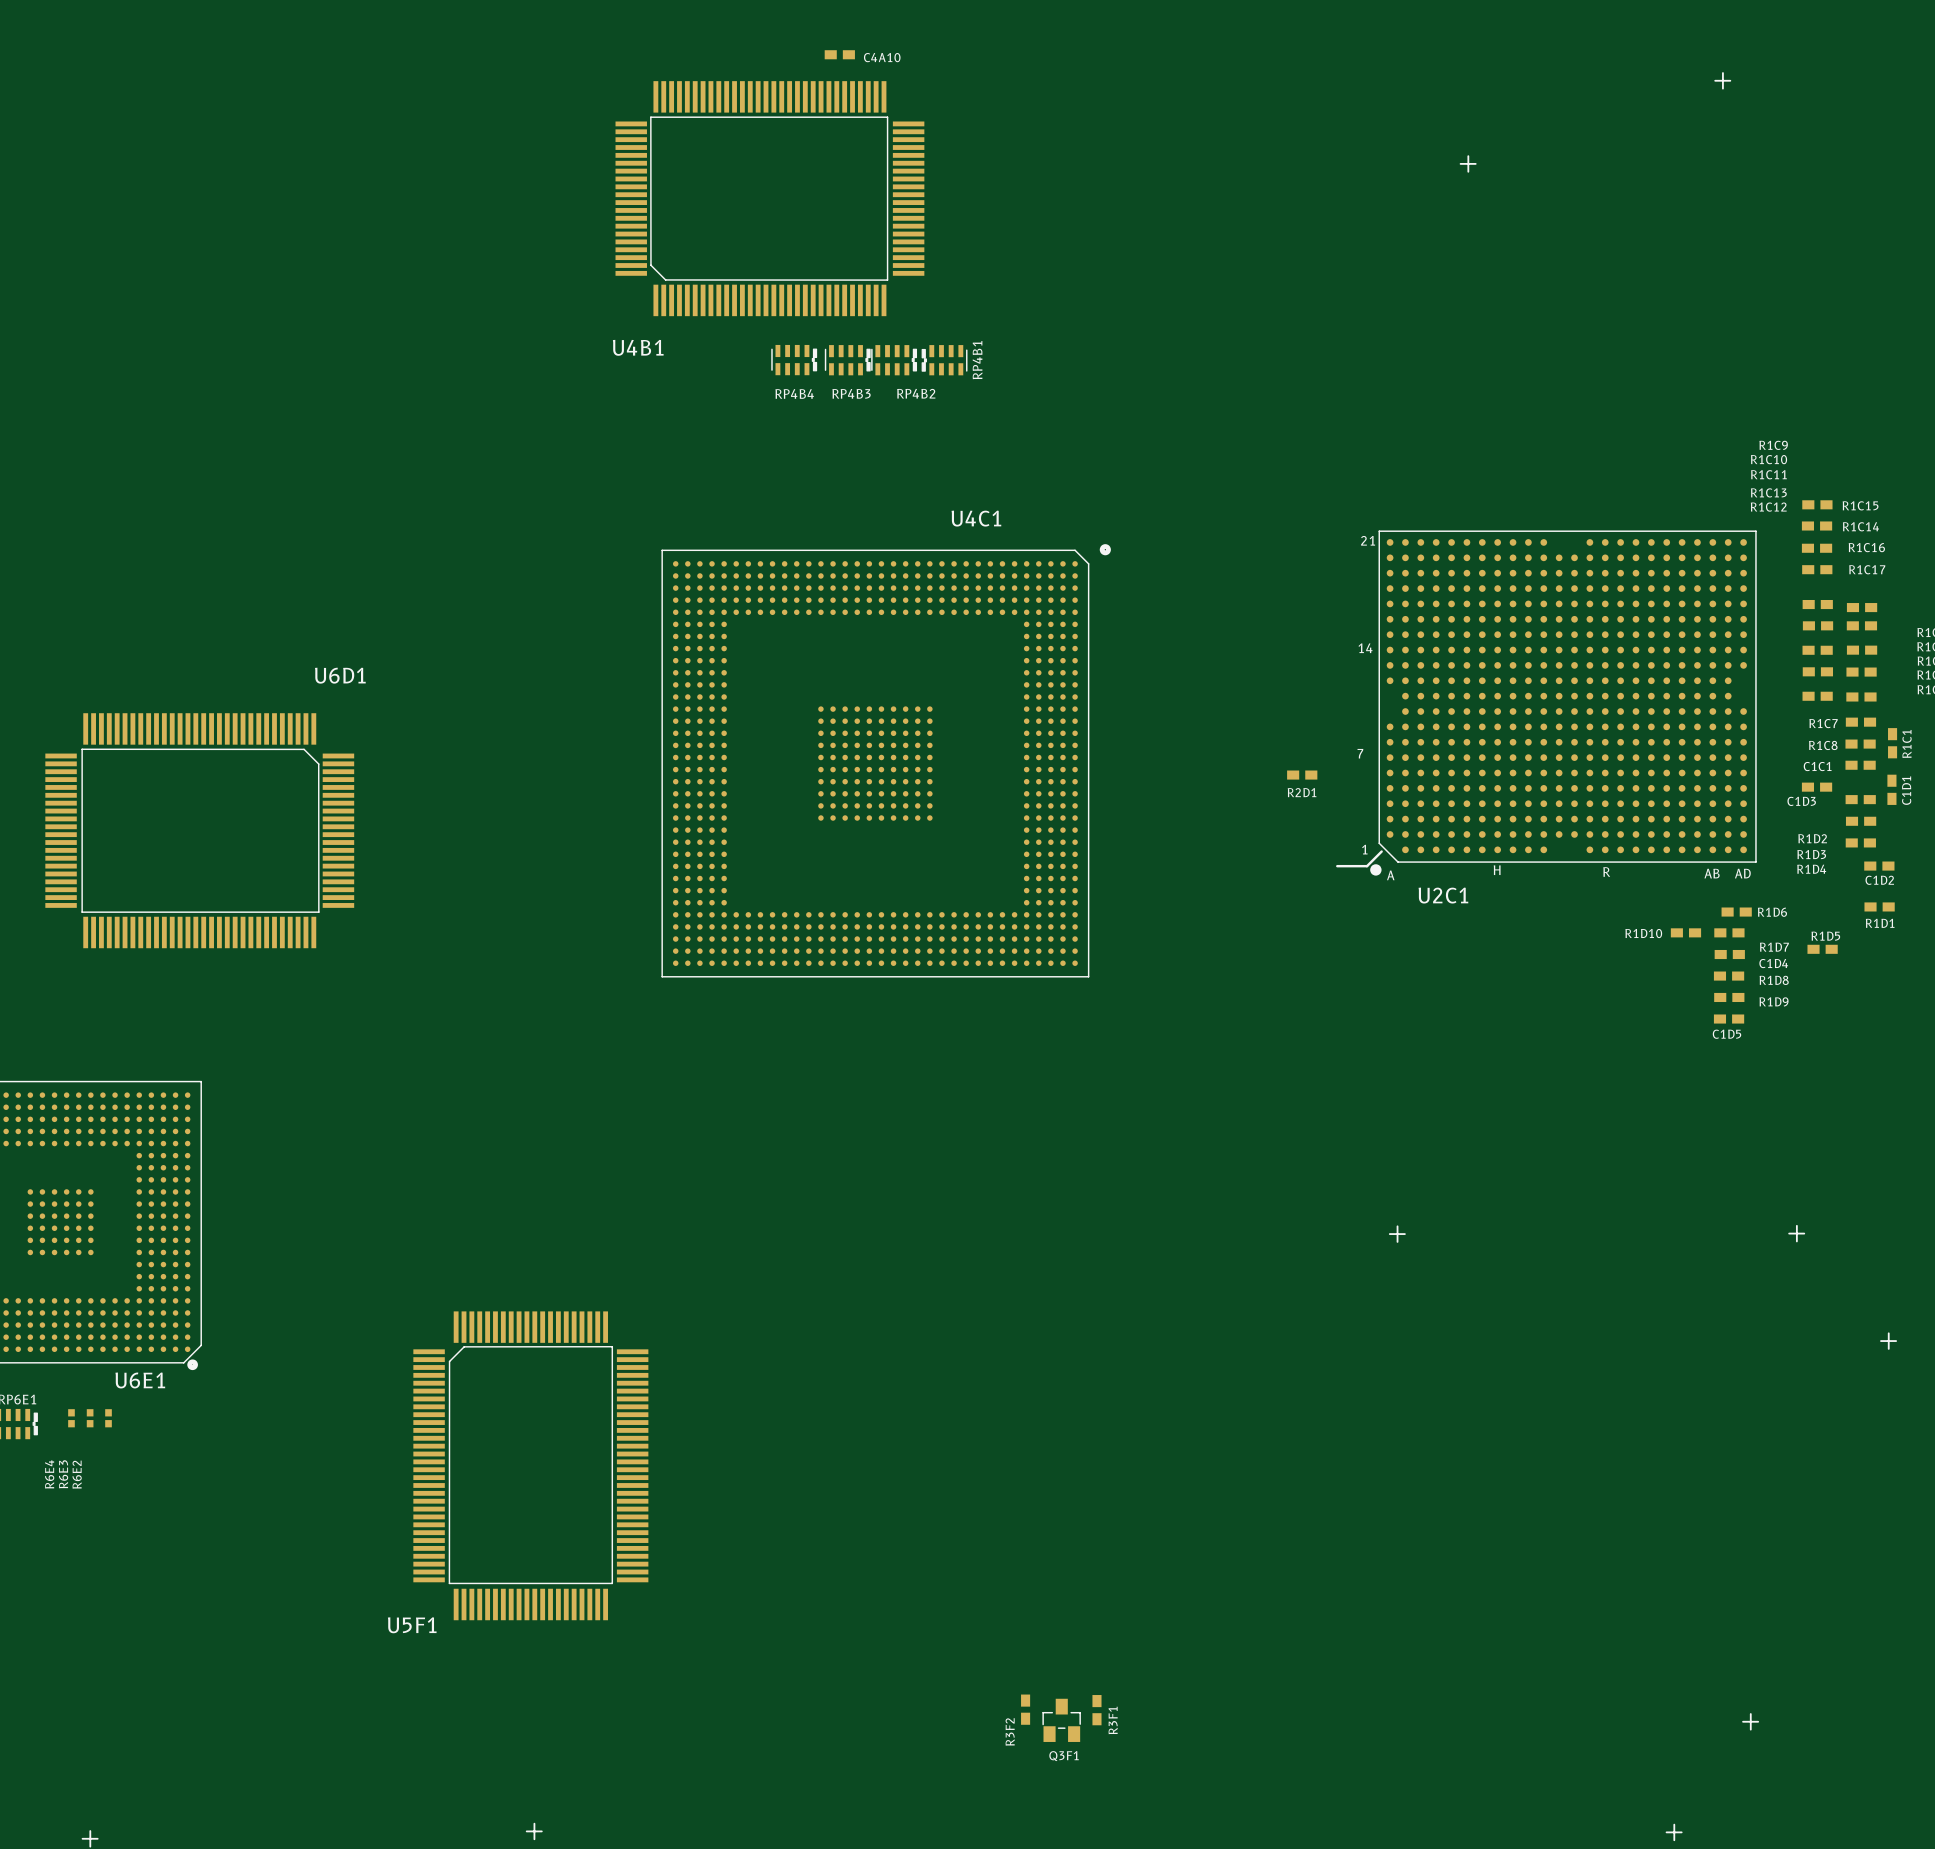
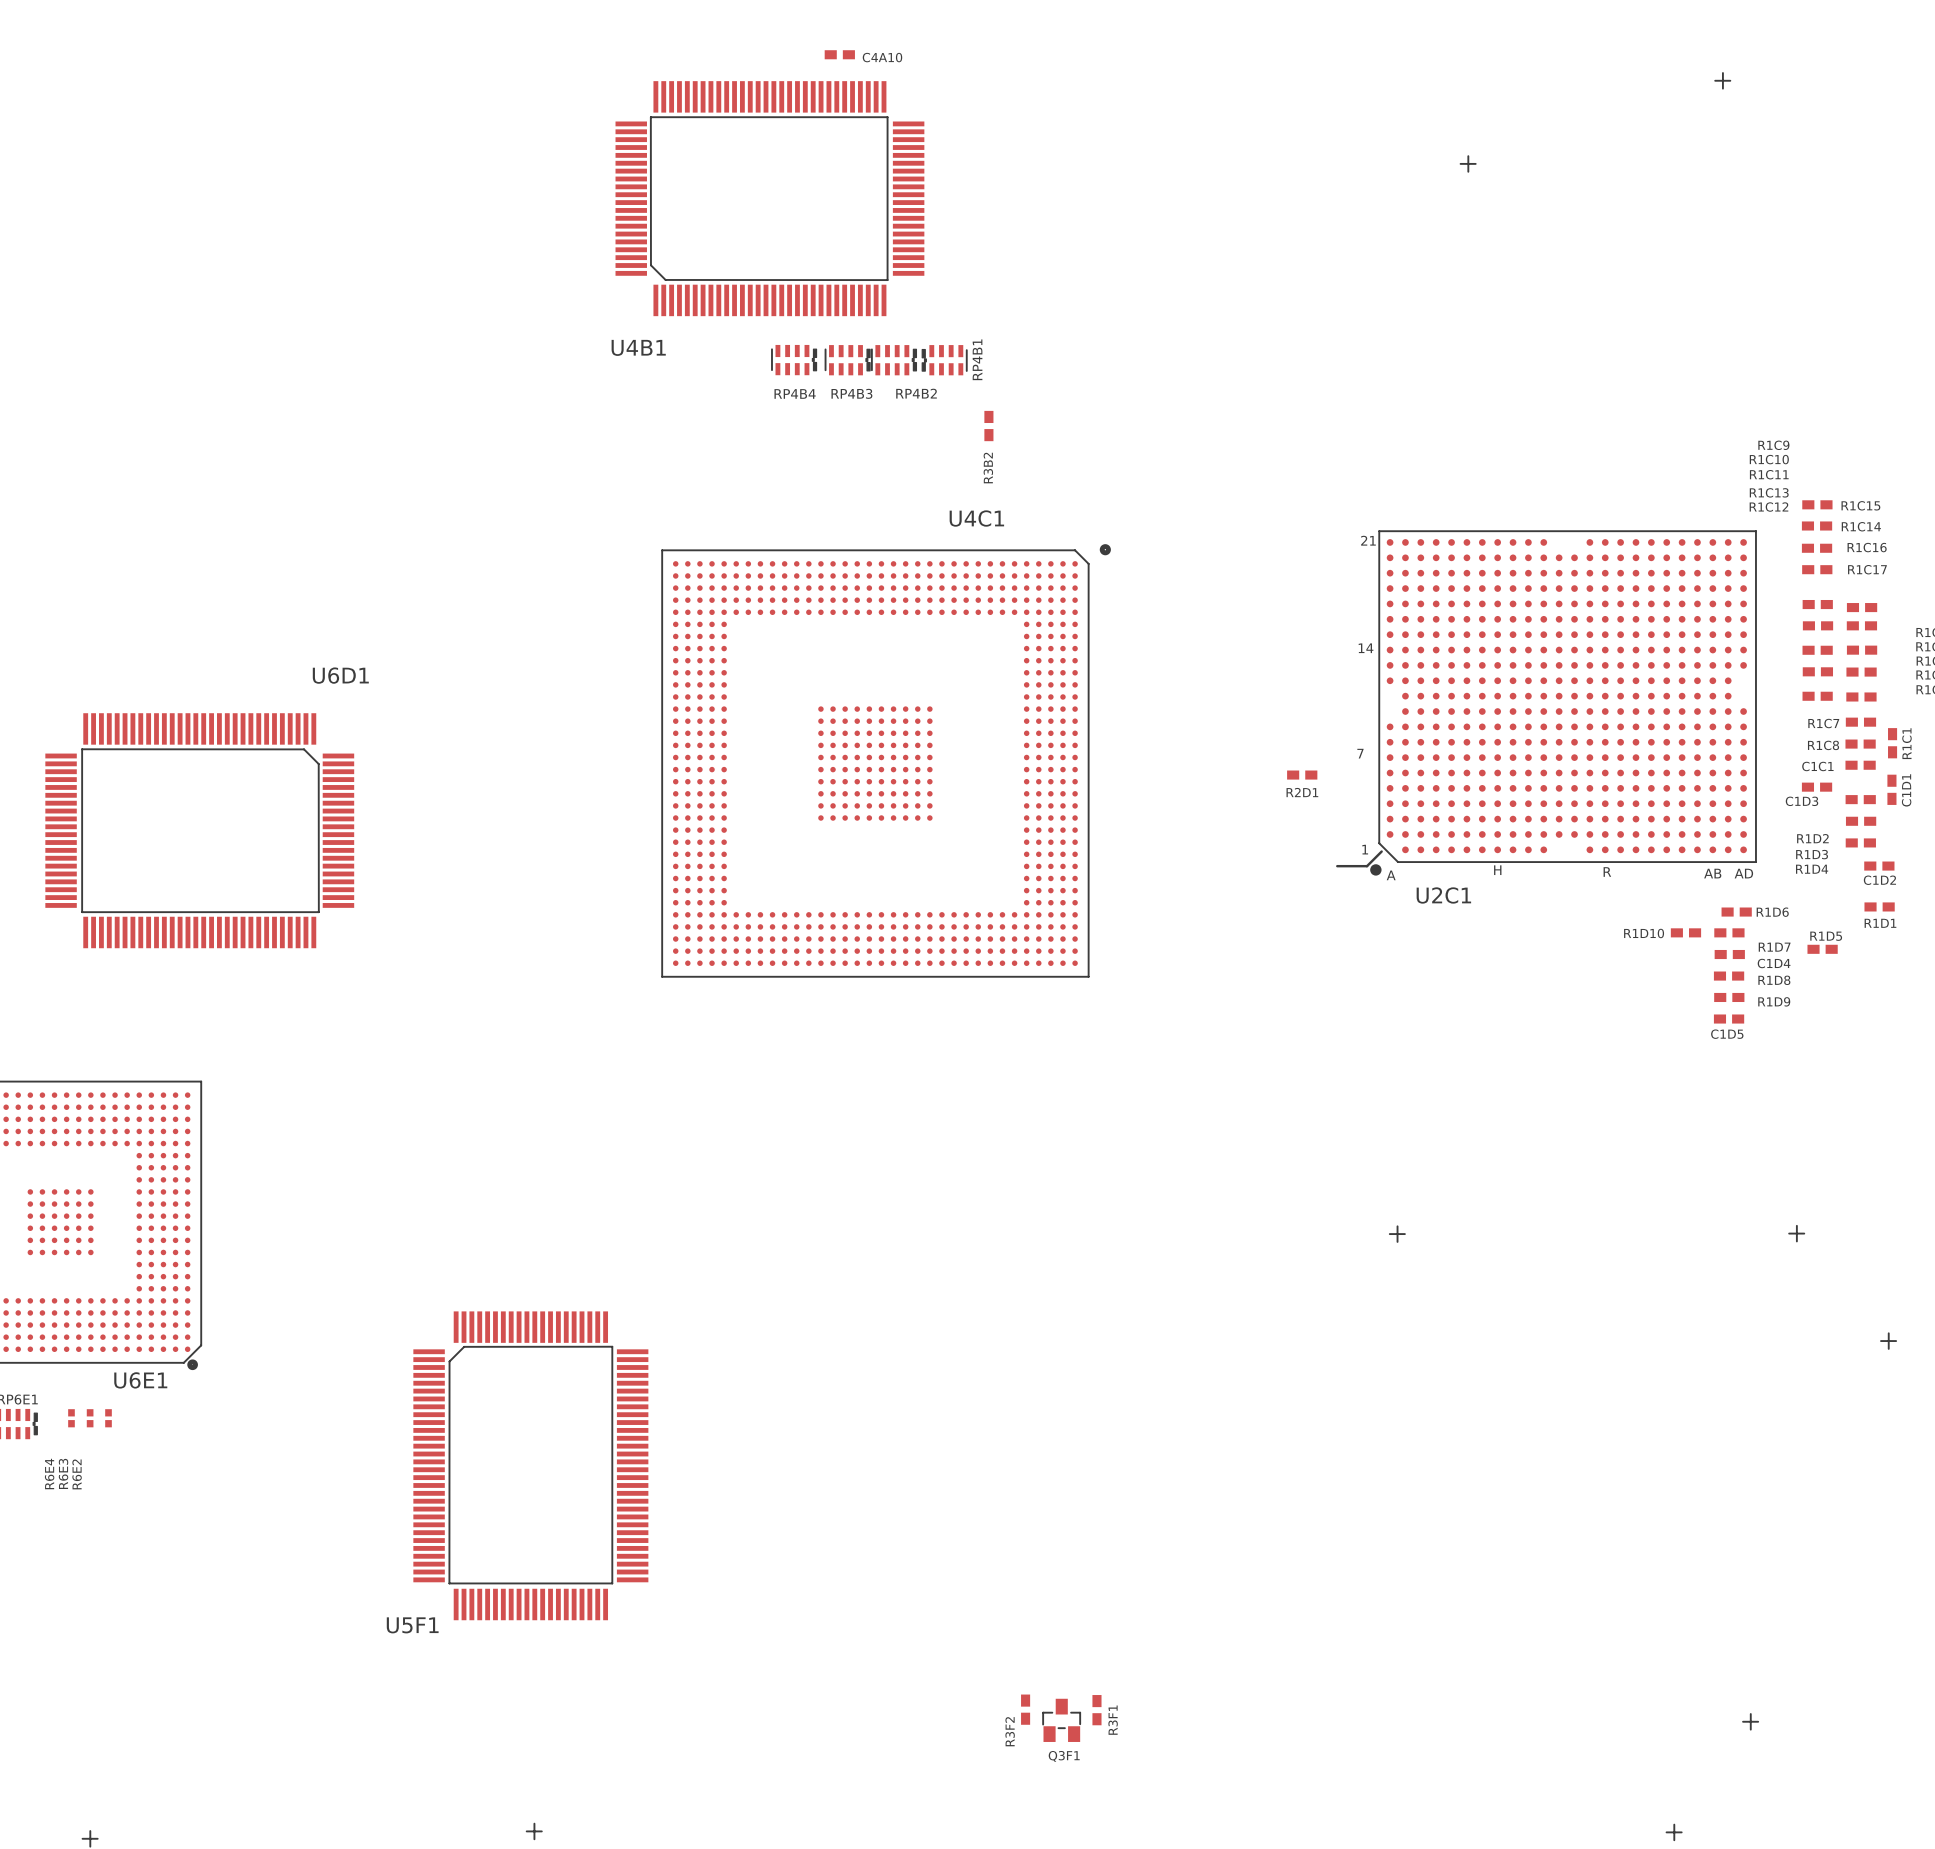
R3B2: none -> (988, 426)

